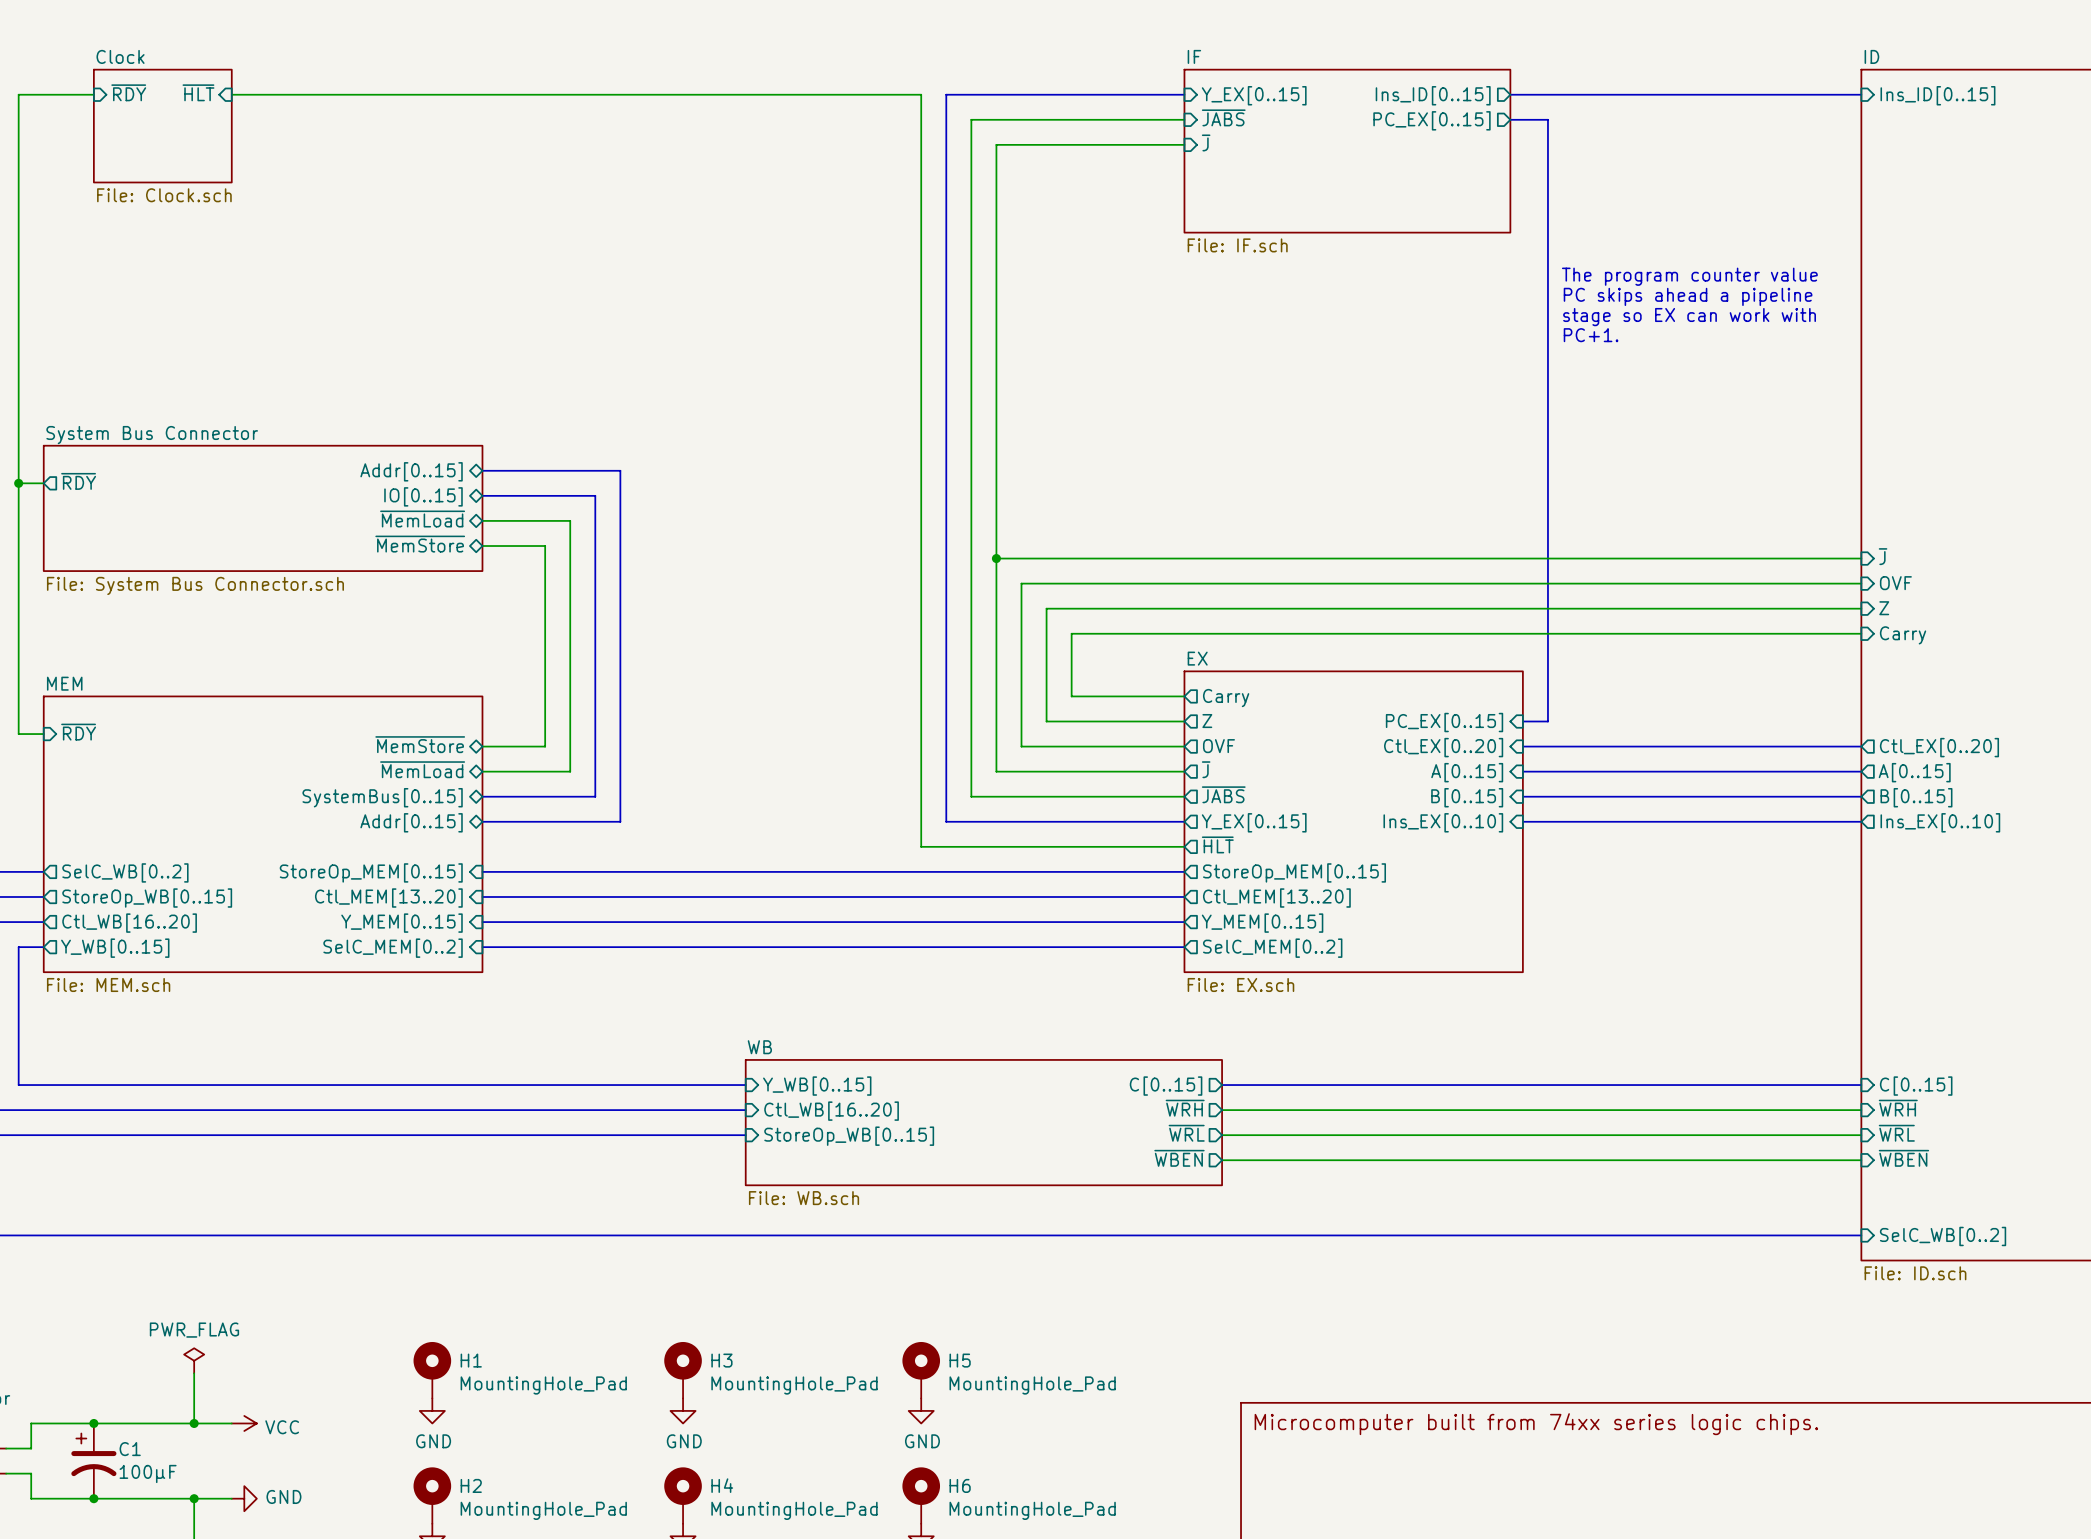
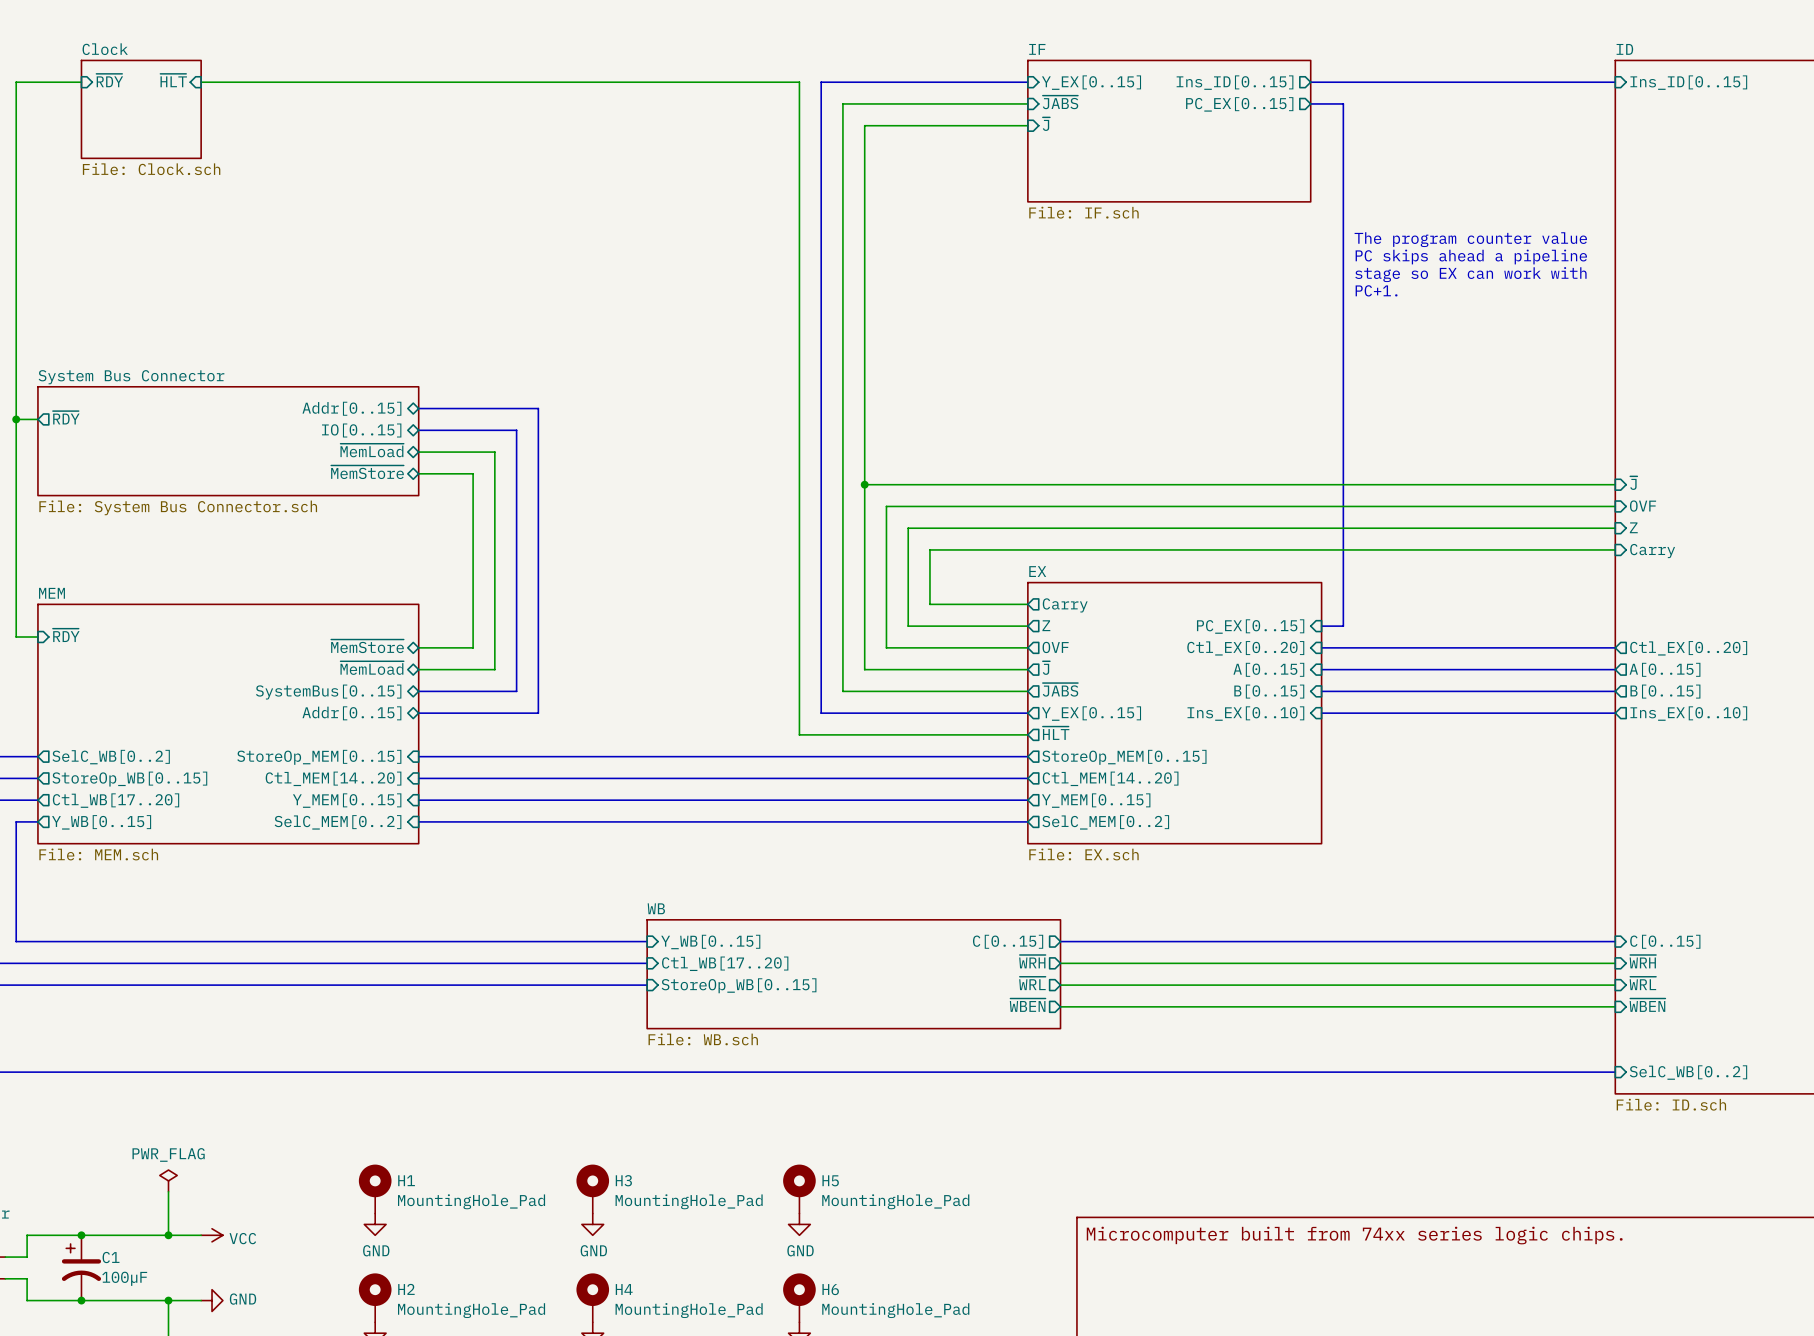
sheet pin: Ctl_MEM[13..20] (388, 898) -> Ctl_MEM[14..20] (333, 778)
sheet pin: Ctl_MEM[13..20] (1276, 898) -> Ctl_MEM[14..20] (1110, 778)
sheet pin: Ctl_WB[16..20] (129, 923) -> Ctl_WB[17..20] (116, 800)
sheet pin: Ctl_WB[16..20] (831, 1111) -> Ctl_WB[17..20] (725, 963)

